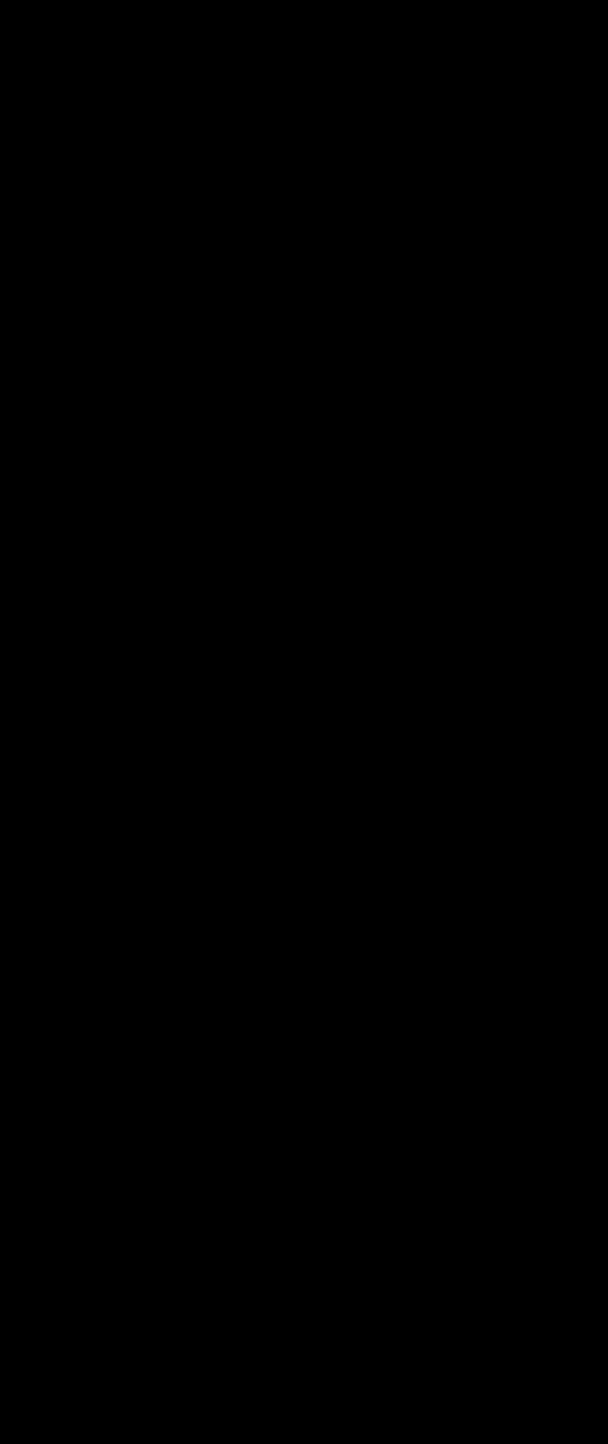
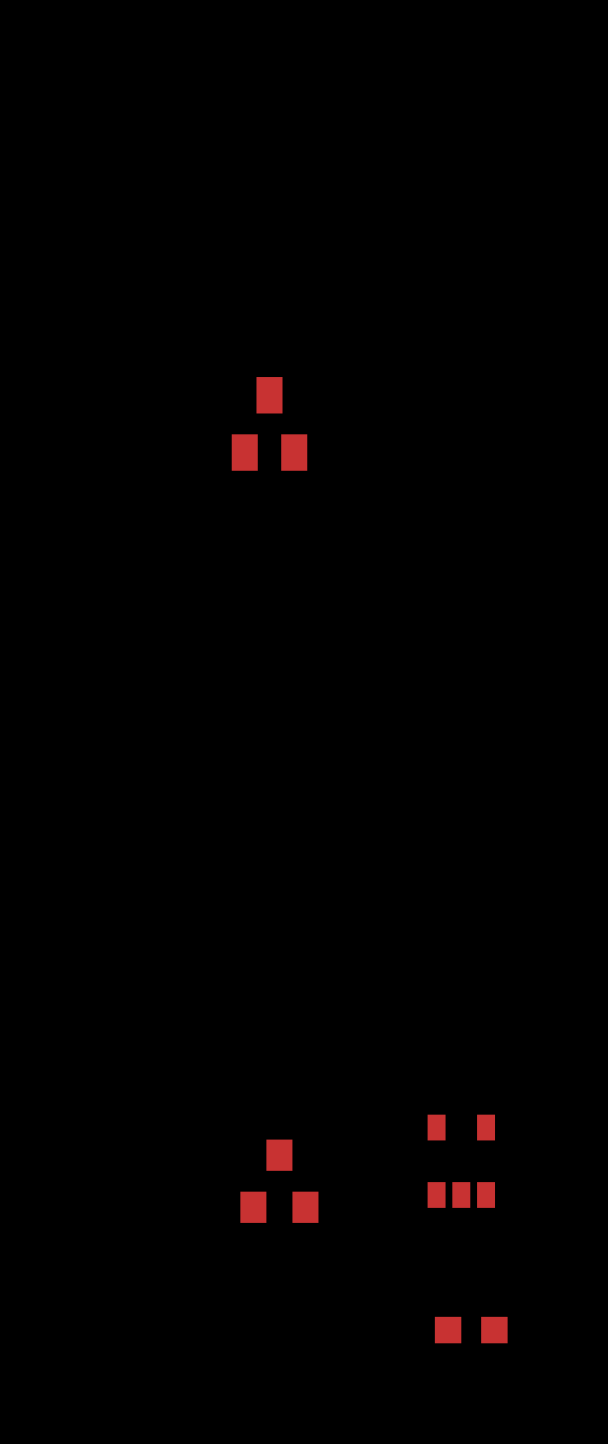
part: none -> (269, 423)
part: none -> (461, 1161)
part: none -> (279, 1181)
part: none -> (471, 1330)

